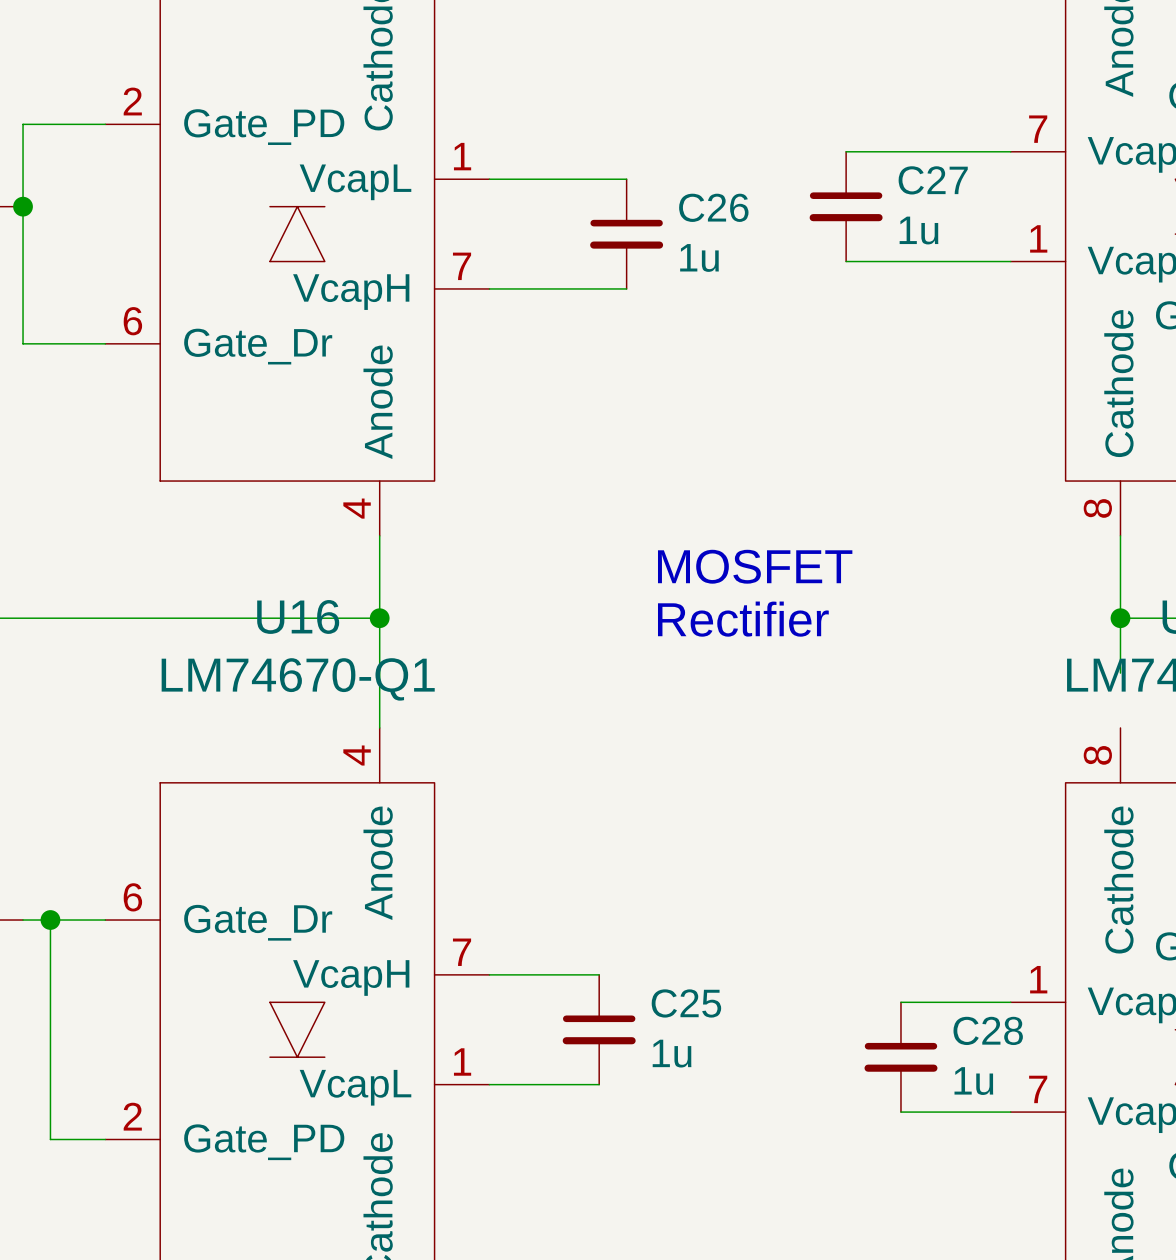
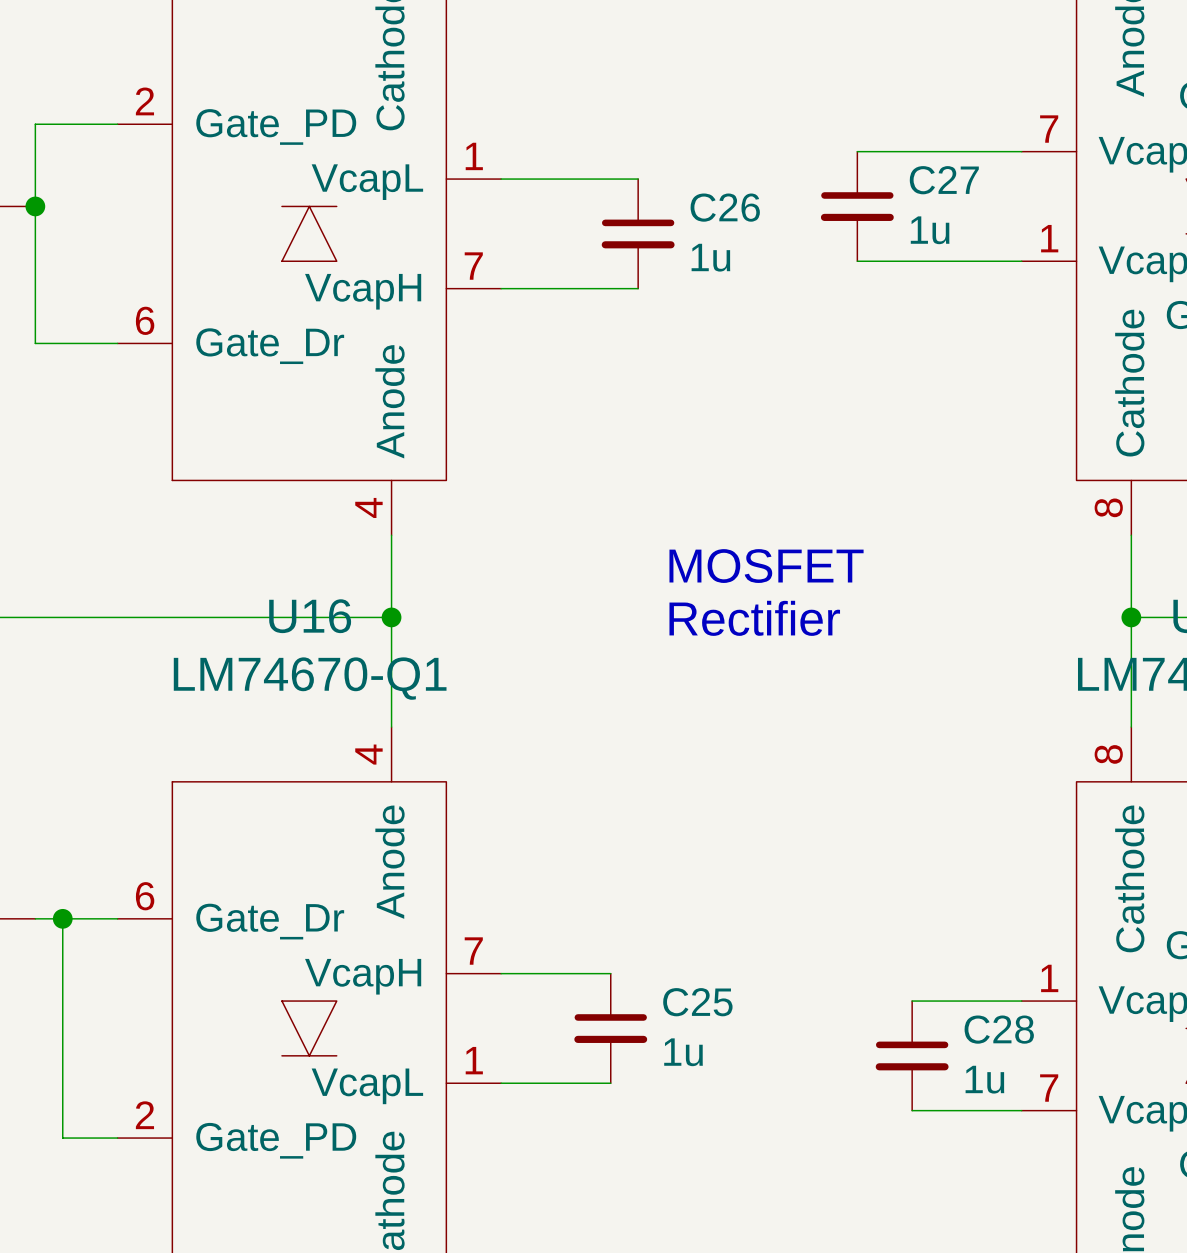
wire: none -> (1131, 672) (1131, 727)

